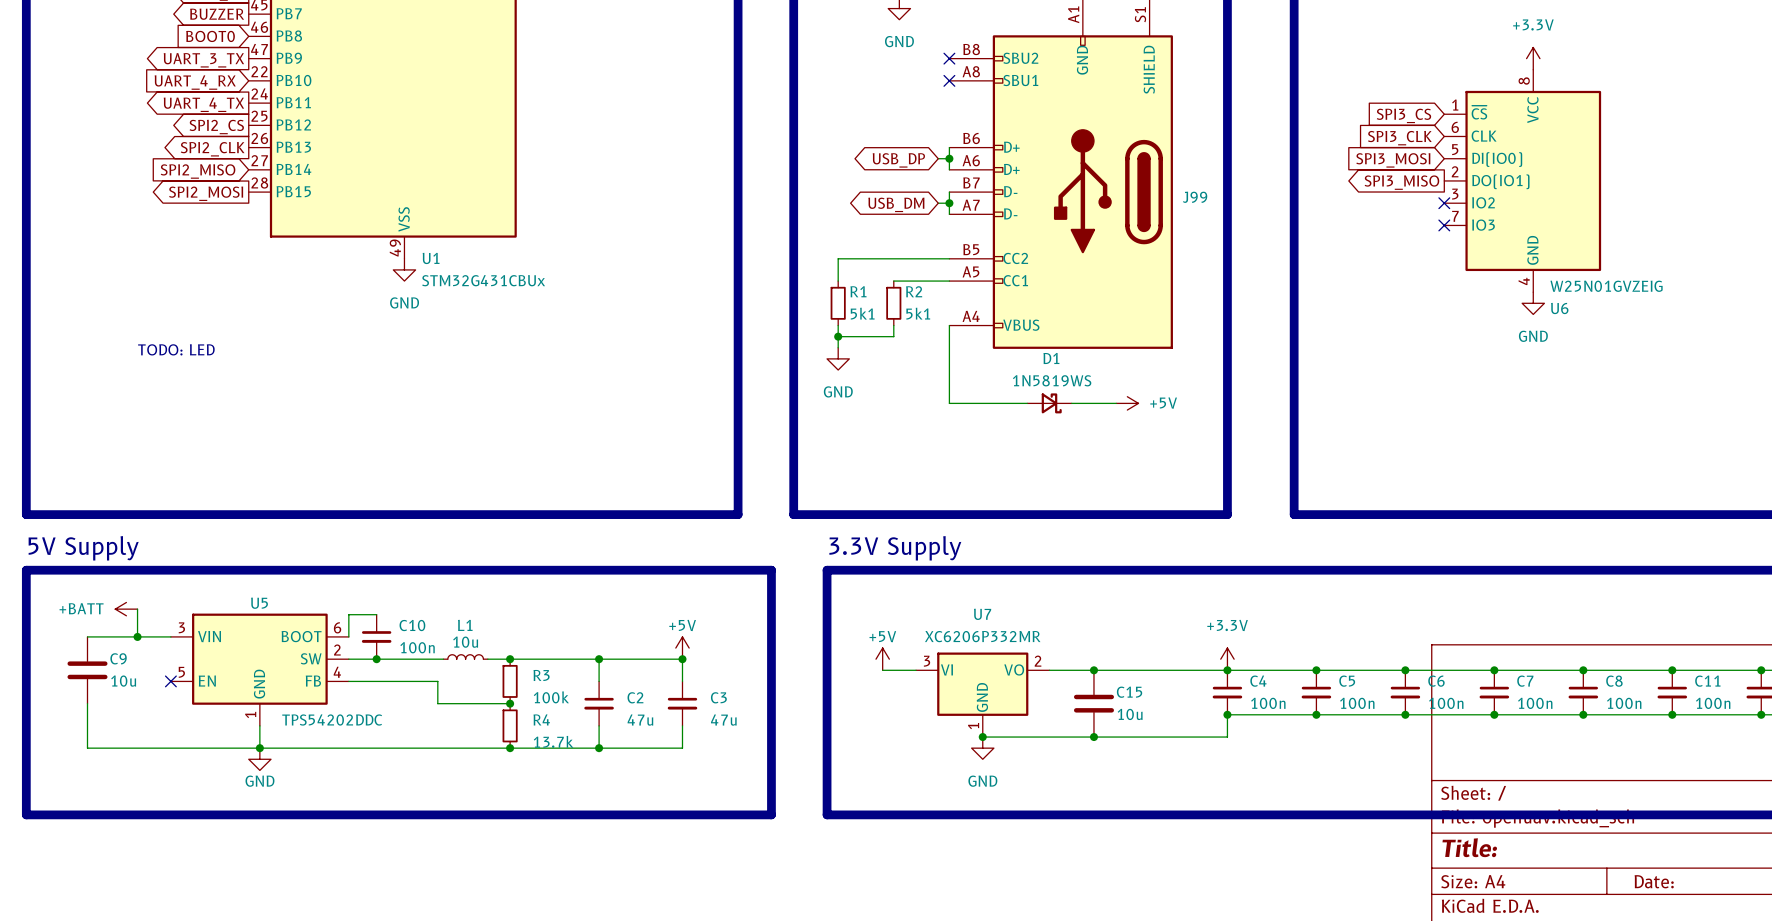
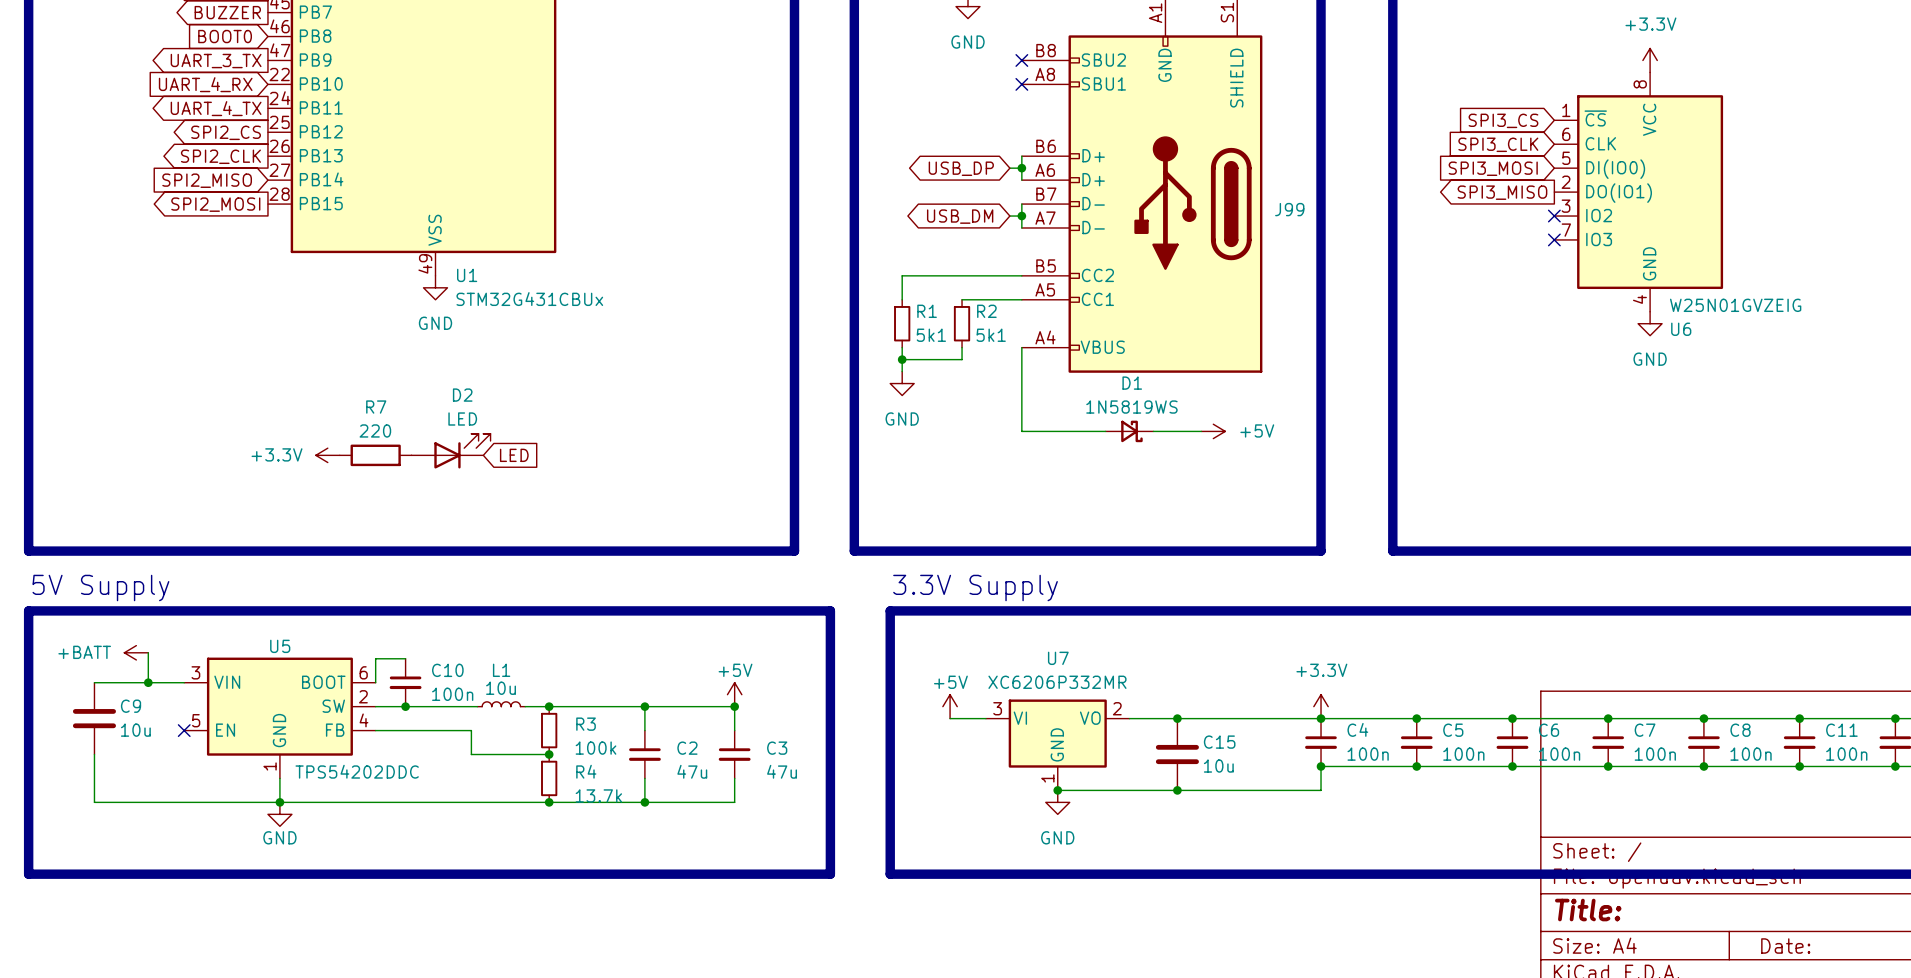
text: TODO: LED (176, 349) -> none
D2: none -> LED (451, 451)
power symbol: none -> +3.3V (327, 455)
R7: none -> 220 (375, 455)
global label: none -> LED (514, 455)

